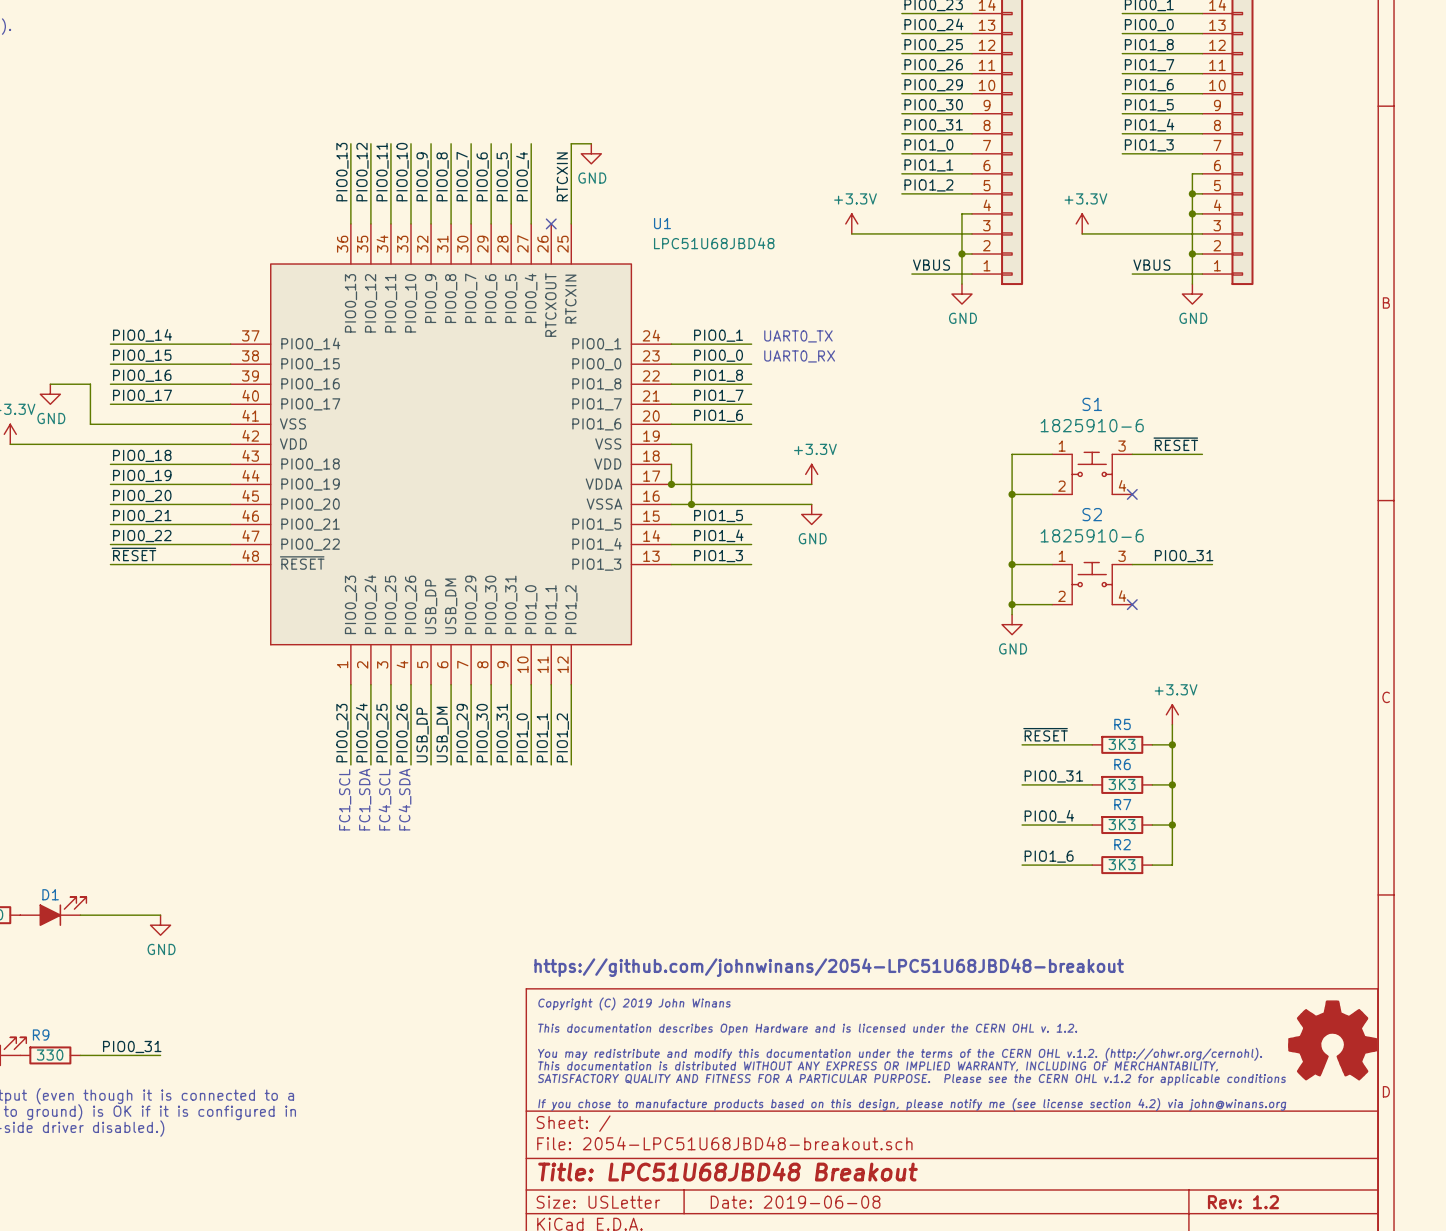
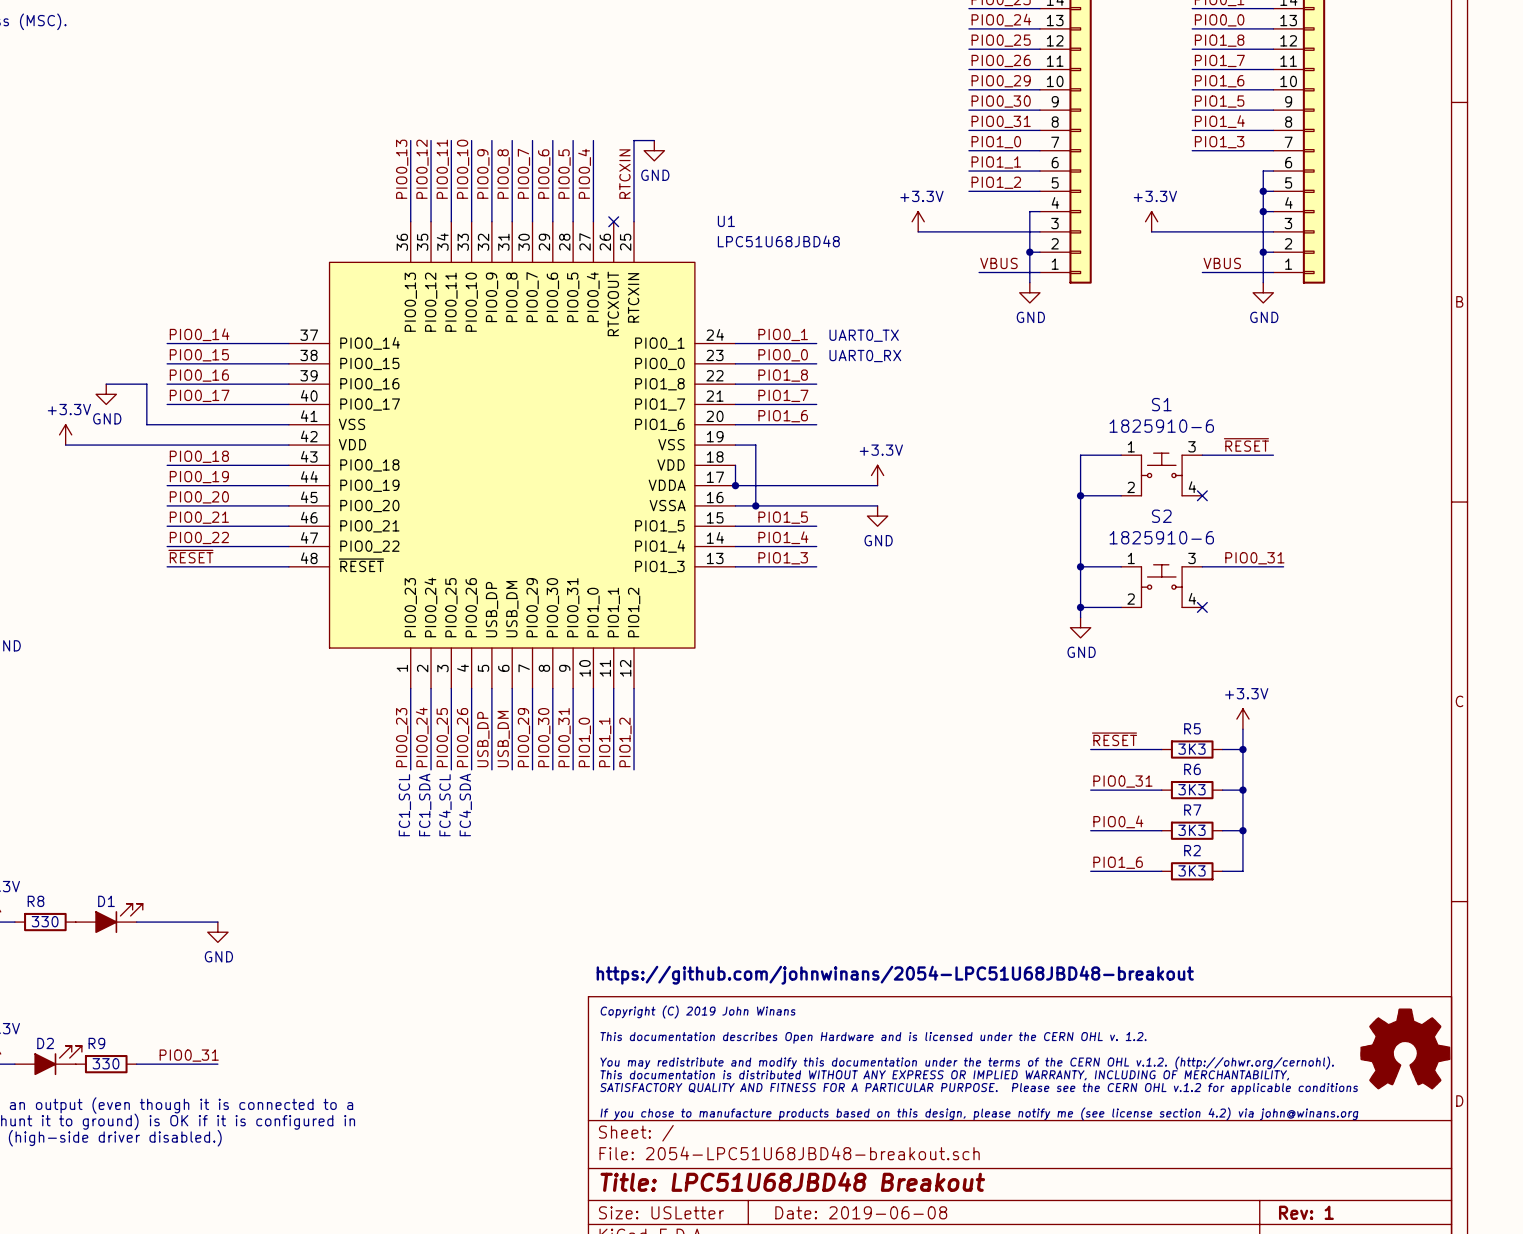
title block: Rev: 1.2 (1243, 1202) -> Rev: 1 (1306, 1212)

